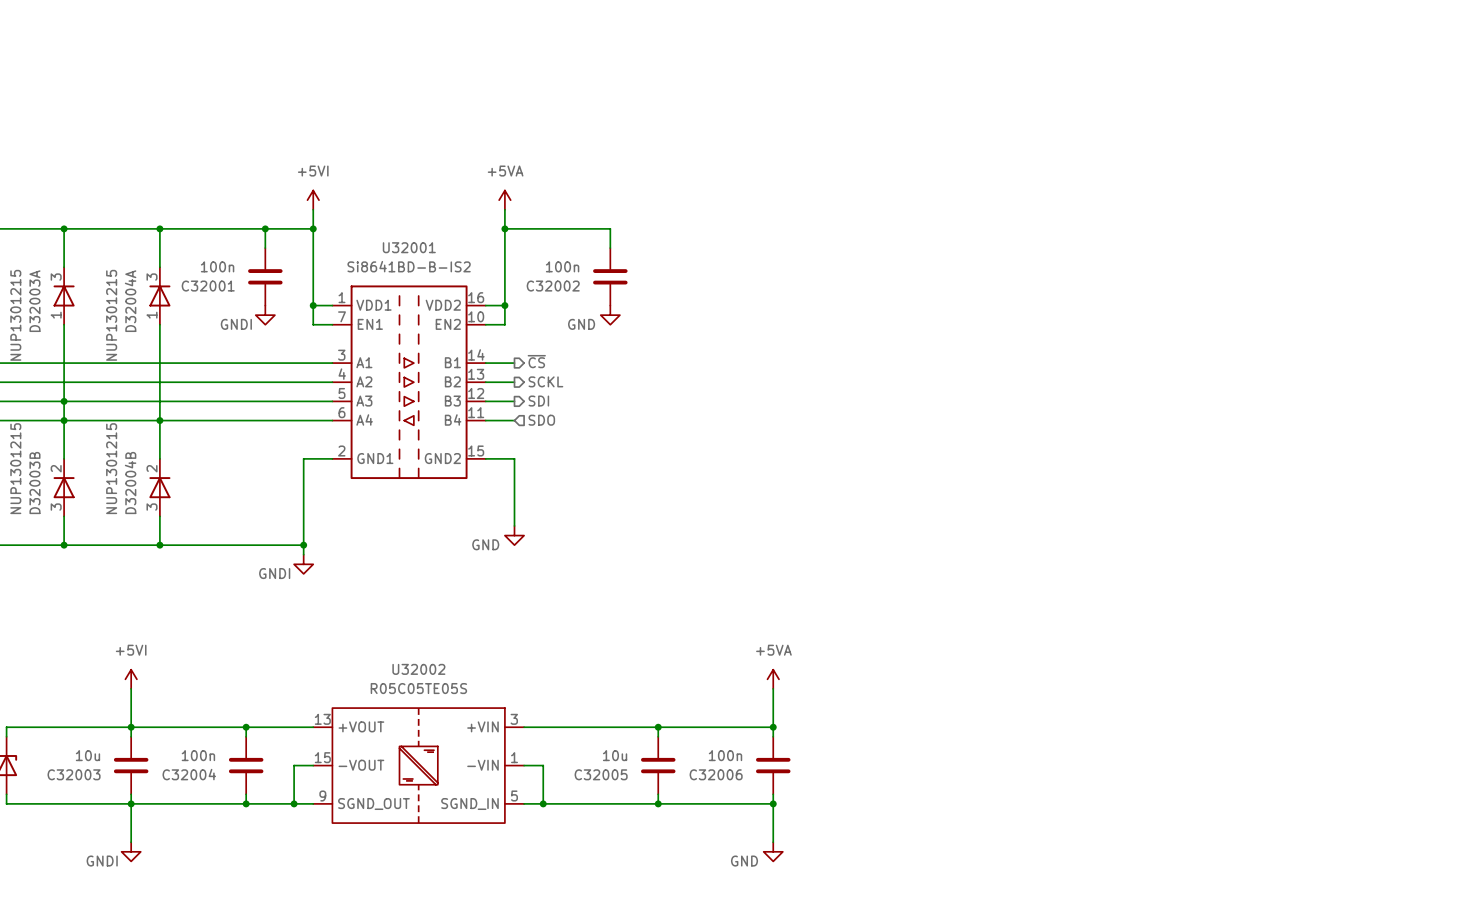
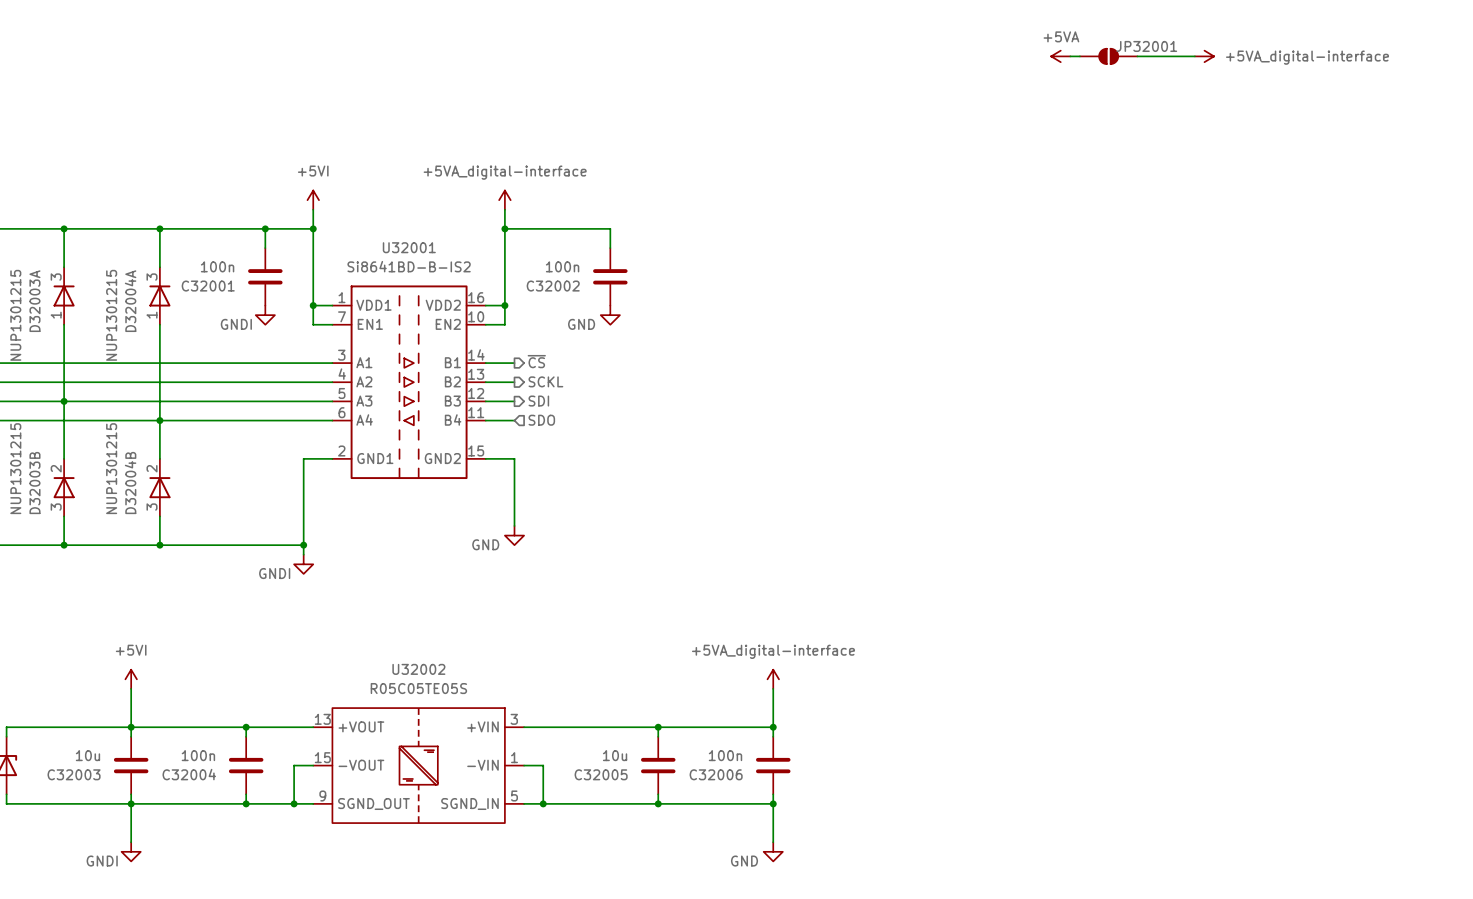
power symbol: none -> +5VA (1060, 56)
wire: none -> (1070, 56) (1079, 56)
JP32001: none -> (1108, 56)
wire: none -> (1137, 56) (1194, 56)
power symbol: none -> +5VA_digital-interface (1204, 56)
power symbol: +5VA (504, 200) -> +5VA_digital-interface (504, 200)
junction: (64, 420) -> none
power symbol: +5VA (773, 679) -> +5VA_digital-interface (773, 679)

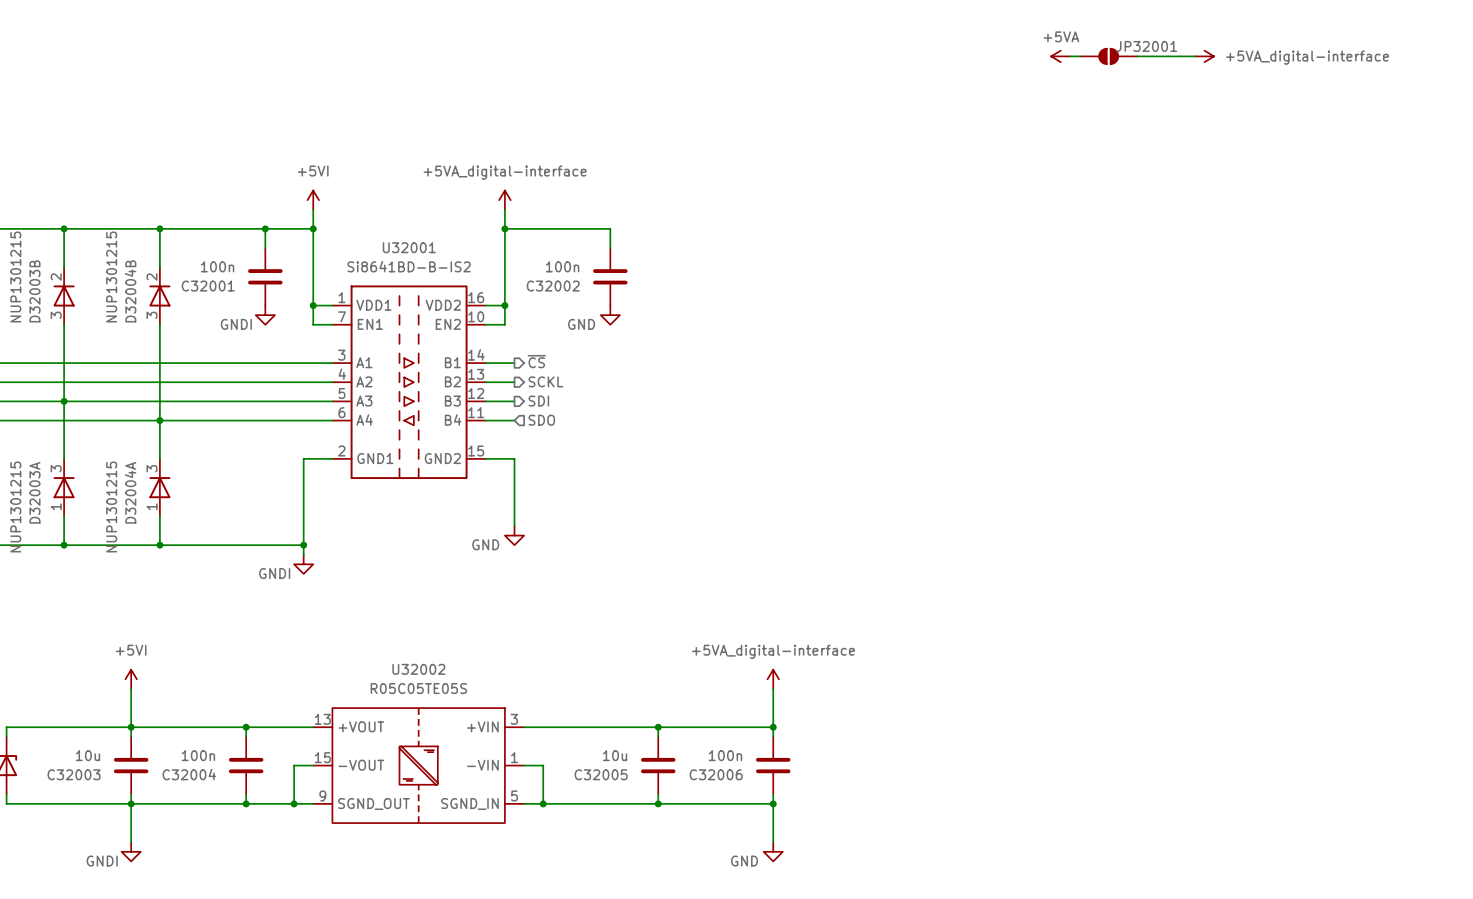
D32003A position: (64, 295) -> (64, 487)
D32004A position: (159, 295) -> (159, 487)
D32003B position: (64, 487) -> (64, 295)
D32004B position: (159, 487) -> (159, 295)

